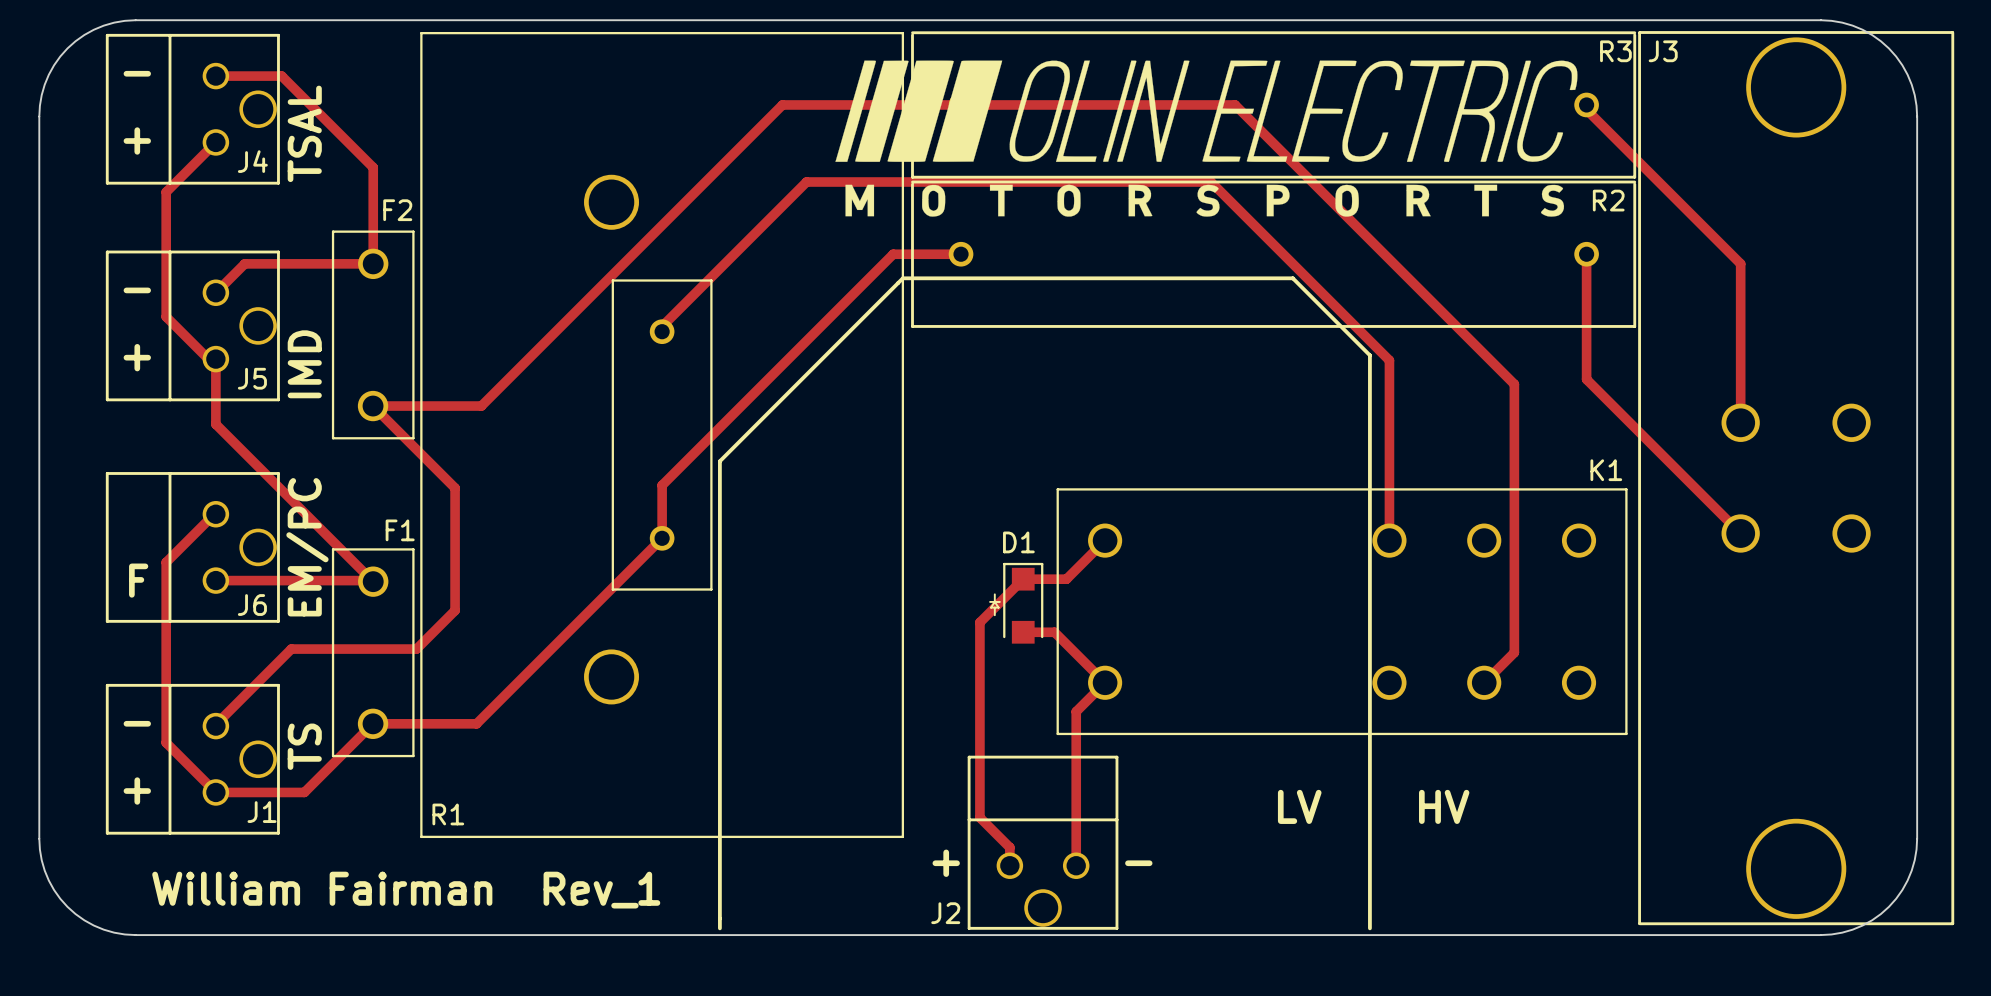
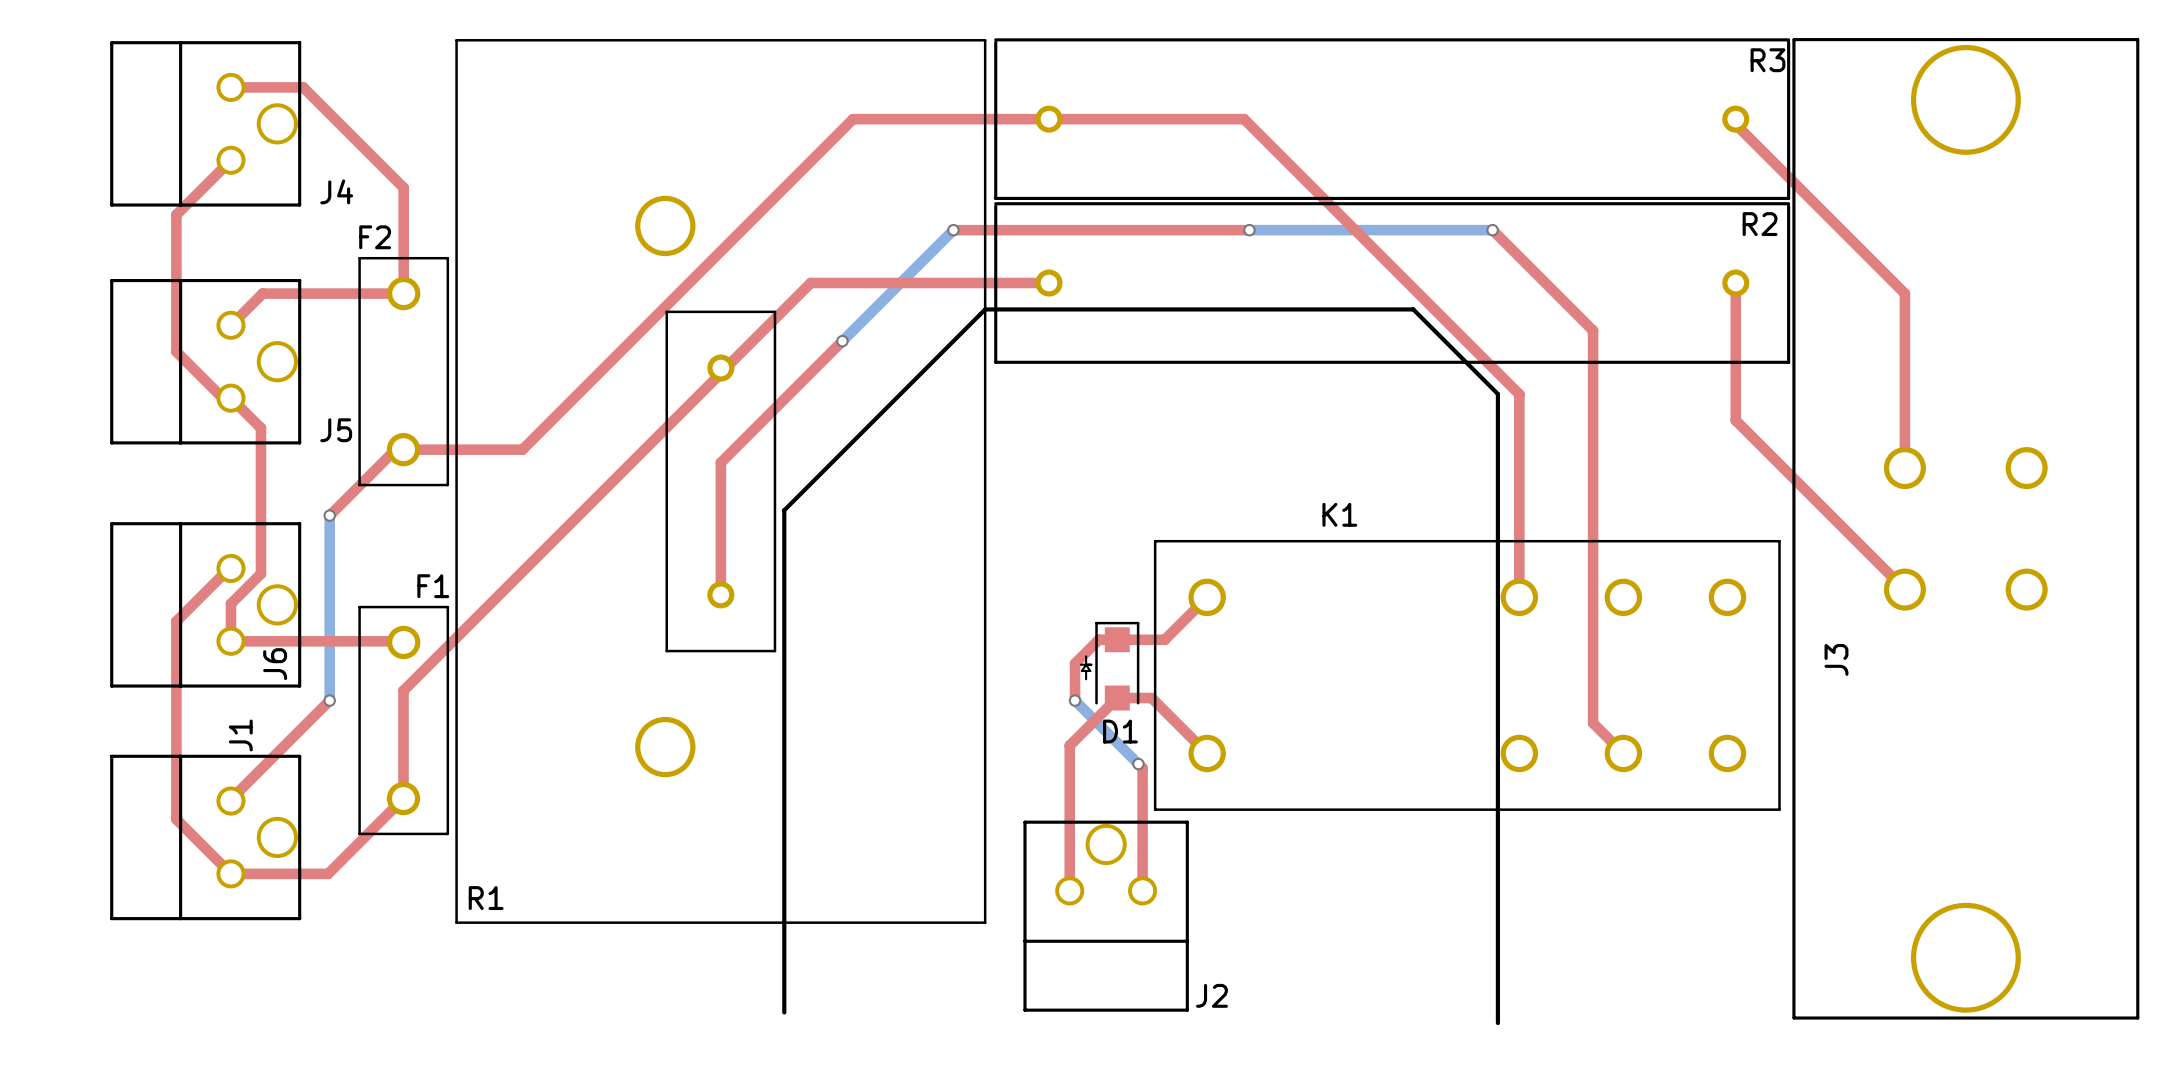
board edge: (135, 20) (1820, 20) (1842, 22) (1862, 29) (1880, 41) (1902, 65) (1914, 95) (1917, 116) (1917, 838) (1914, 860) (1907, 880) (1888, 906) (1872, 920) (1852, 929) (1820, 935) (135, 935) (114, 932) (93, 925) (75, 914) (54, 890) (44, 870) (39, 849) (39, 116) (41, 95) (48, 74) (67, 48) (93, 29) (114, 22) (135, 20) -> none
J3 name rotation: 0° (1663, 51) -> 90° counterclockwise (1836, 659)
J3 name position: J3 (1663, 51) -> J3 (1836, 659)
drawing: [835, 60, 1578, 217] -> none
text: - (137, 73) -> none
top track: (1138, 104) (1235, 104) (1514, 384) (1514, 652) (1484, 682) -> (1492, 230) (1593, 330) (1593, 723) (1623, 753)
text: TSAL (304, 133) -> none
text: + (137, 141) -> none
J4 name position: J4 (252, 161) -> J4 (336, 191)
top track: none -> (953, 230) (1249, 230)
bottom track: none -> (953, 230) (842, 341)
via: none -> (953, 230)
bottom track: none -> (1249, 230) (1492, 230)
via: none -> (1249, 230)
via: none -> (1492, 230)
F2 name position: F2 (397, 210) -> F2 (375, 237)
top track: (893, 254) (662, 485) -> (842, 341) (720, 462) (720, 536)
top track: none -> (974, 283) (810, 283) (725, 368)
text: - (137, 290) -> none
via: none -> (842, 341)
top track: (662, 331) (662, 326) (806, 182) (1211, 182) (1389, 360) -> (1244, 119) (1519, 394) (1519, 399)
text: + (137, 357) -> none
top track: (215, 359) (215, 424) (372, 580) -> (230, 398) (260, 428) (260, 573) (230, 603) (230, 641)
text: IMD (304, 364) -> none
J5 name position: J5 (252, 378) -> J5 (336, 430)
top track: none -> (395, 449) (329, 515)
top track: (373, 406) (455, 488) (455, 610) (416, 649) (291, 649) -> (329, 700) (313, 716)
bottom track: none -> (329, 515) (329, 700)
via: none -> (329, 515)
K1 name position: K1 (1606, 470) -> K1 (1339, 514)
top track: (662, 538) (476, 723) (373, 723) -> (720, 373) (403, 690) (403, 798)
D1 name position: D1 (1018, 542) -> D1 (1120, 731)
text: EM/PC (307, 547) -> none
top track: (1023, 579) (979, 622) (979, 675) -> (1117, 639) (1098, 639) (1075, 663) (1075, 700)
text: F (138, 580) -> none
J6 name rotation: 0° (252, 605) -> 90° counterclockwise (275, 664)
top track: none -> (1117, 698) (1069, 745)
via: none -> (329, 700)
bottom track: none -> (1075, 700) (1138, 764)
via: none -> (1075, 700)
top track: (1105, 682) (1076, 711) (1076, 865) -> none
top track: none -> (1138, 764) (1142, 768) (1142, 890)
via: none -> (1138, 764)
text: - (137, 723) -> none
text: TS (304, 746) -> none
text: + (137, 791) -> none
text: LV (1299, 806) -> none
text: HV (1444, 806) -> none
top track: (979, 807) (979, 817) (1009, 847) (1009, 865) -> none
J1 name rotation: 0° (262, 812) -> 90° counterclockwise (240, 735)
J1 name position: J1 (262, 812) -> J1 (240, 735)
J2 rotation: 0° (1043, 842) -> 180° (1106, 916)
text: + (946, 863) -> none
text: - (1138, 863) -> none
text: William Fairman Rev_1 (406, 890) -> none
J2 name position: J2 (945, 913) -> J2 (1211, 995)
line: (719, 918) (719, 928) -> none

